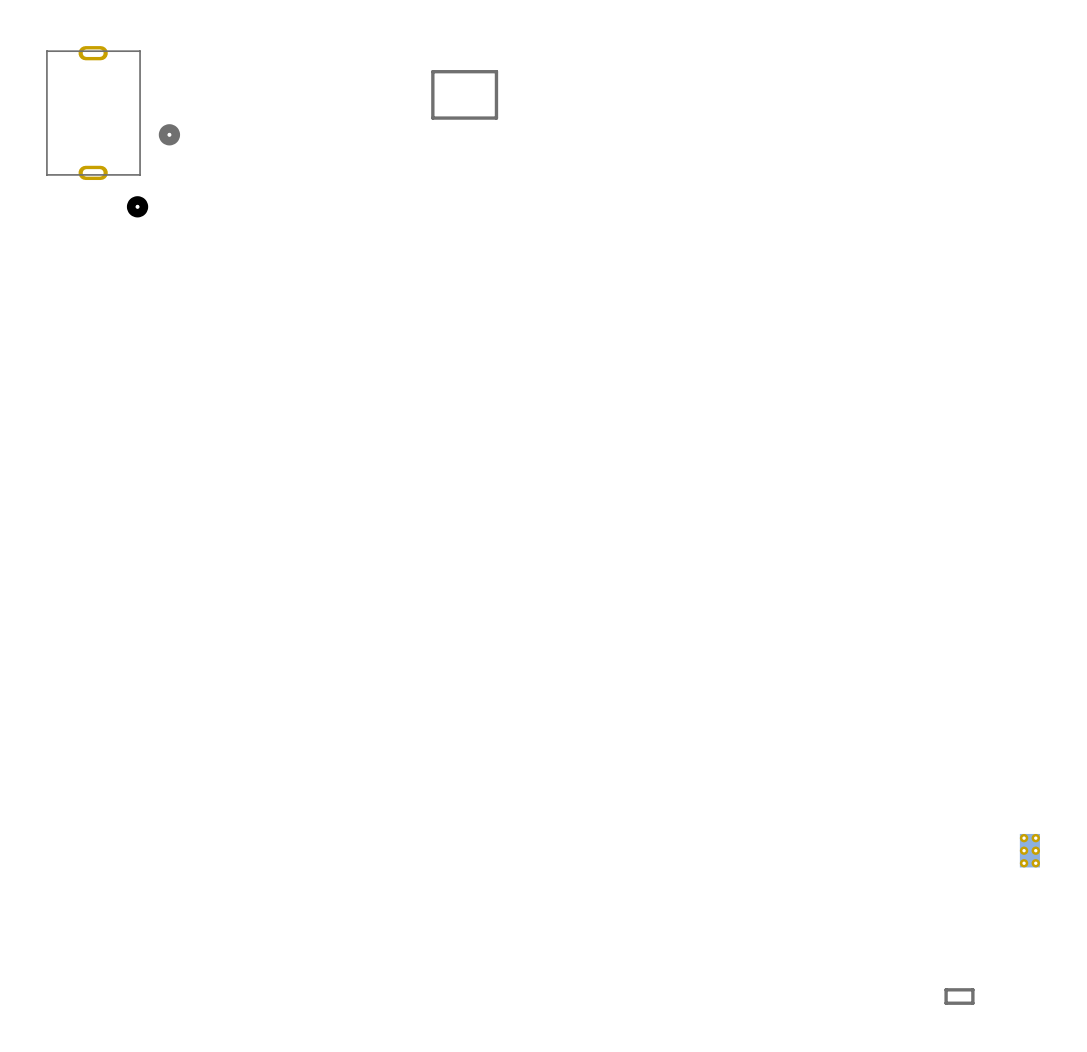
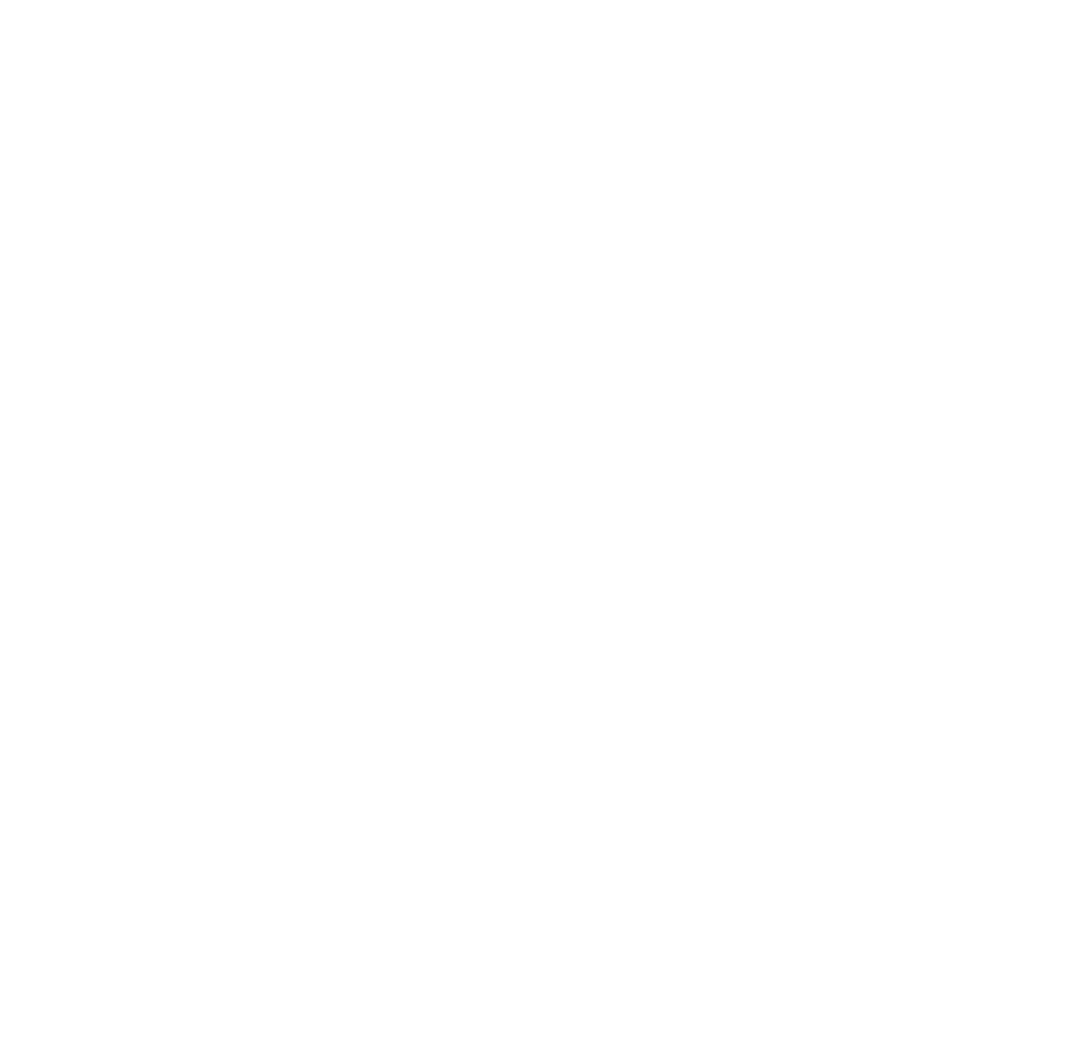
part: (464, 94) -> none
part: (113, 131) -> none
part: (1029, 850) -> none
part: (959, 996) -> none

